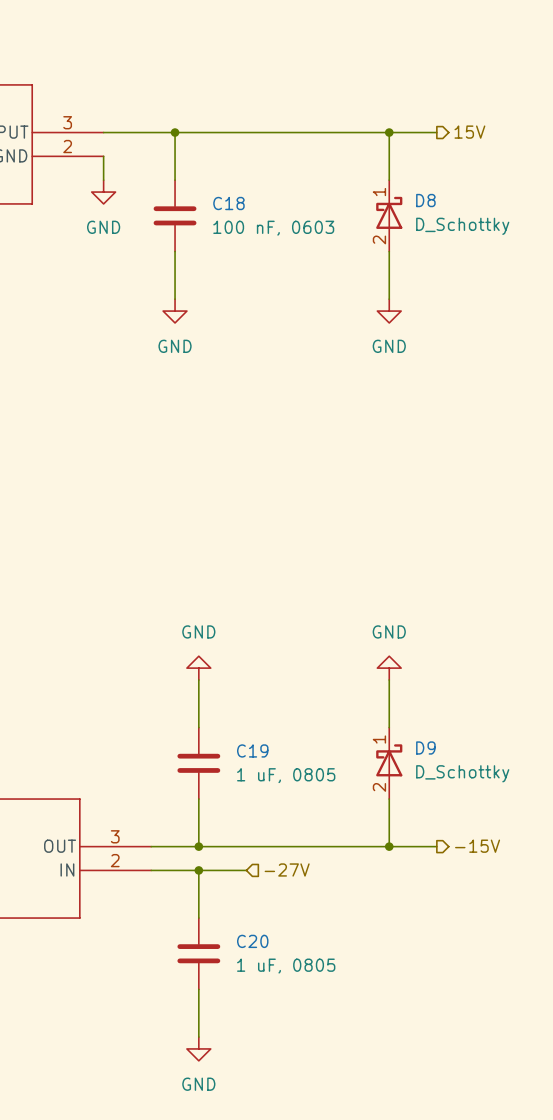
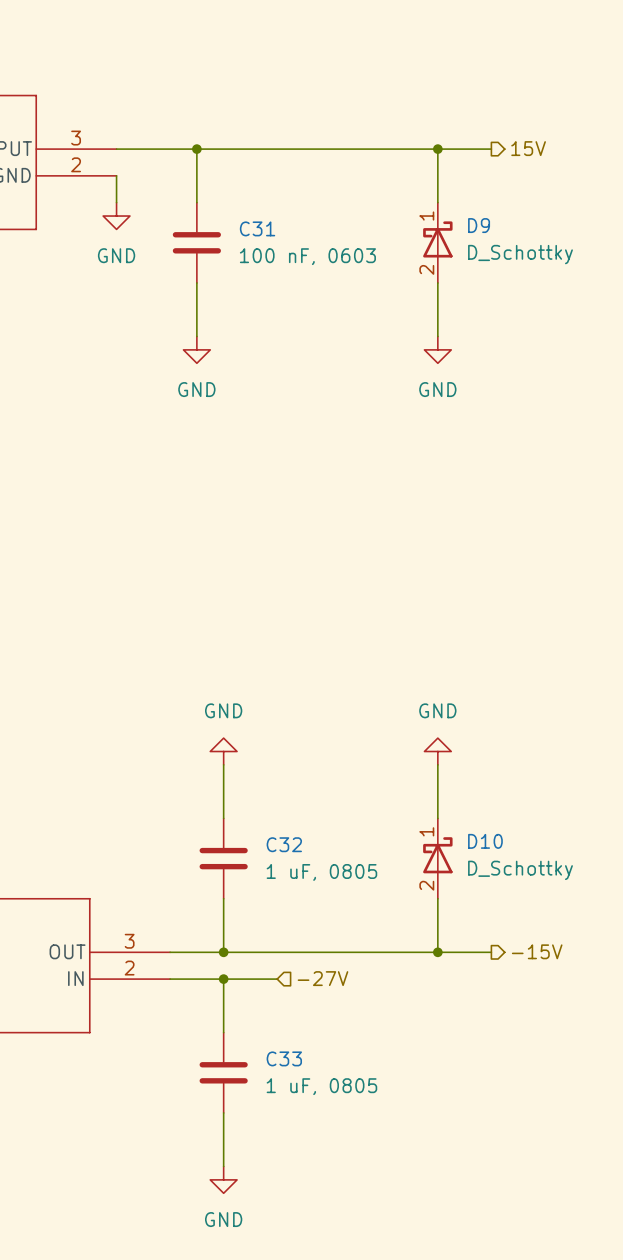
D8 name: D8 (425, 200) -> D9 (479, 225)
C18 name: C18 (228, 203) -> C31 (257, 228)
D9 name: D9 (425, 748) -> D10 (485, 841)
C19 name: C19 (252, 750) -> C32 (284, 844)
C20 name: C20 (252, 941) -> C33 (284, 1058)

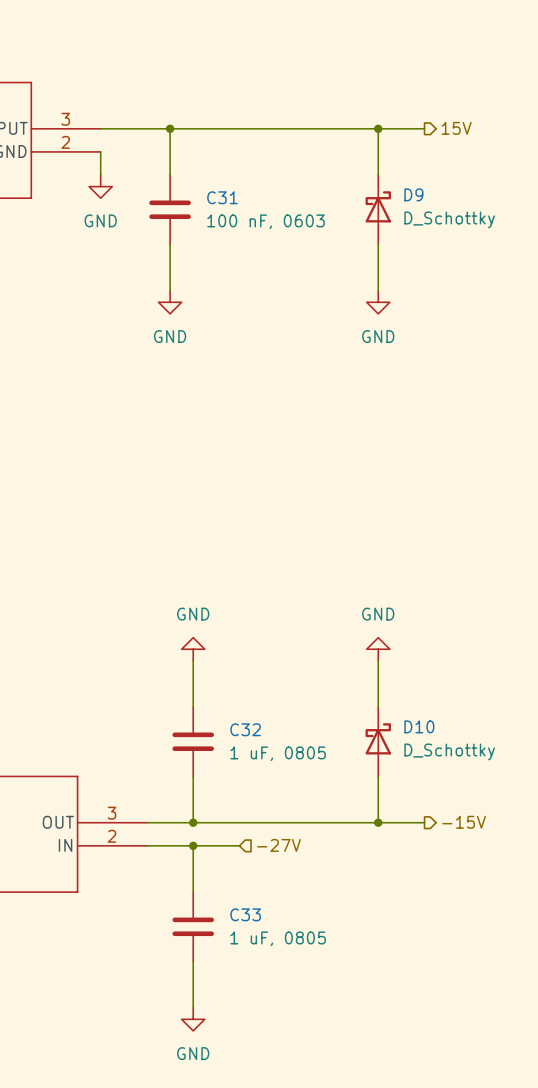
D9 pin number: 1 (426, 216) -> none
D9 pin number: 2 (426, 269) -> none
D10 pin number: 1 (426, 831) -> none
D10 pin number: 2 (426, 885) -> none

